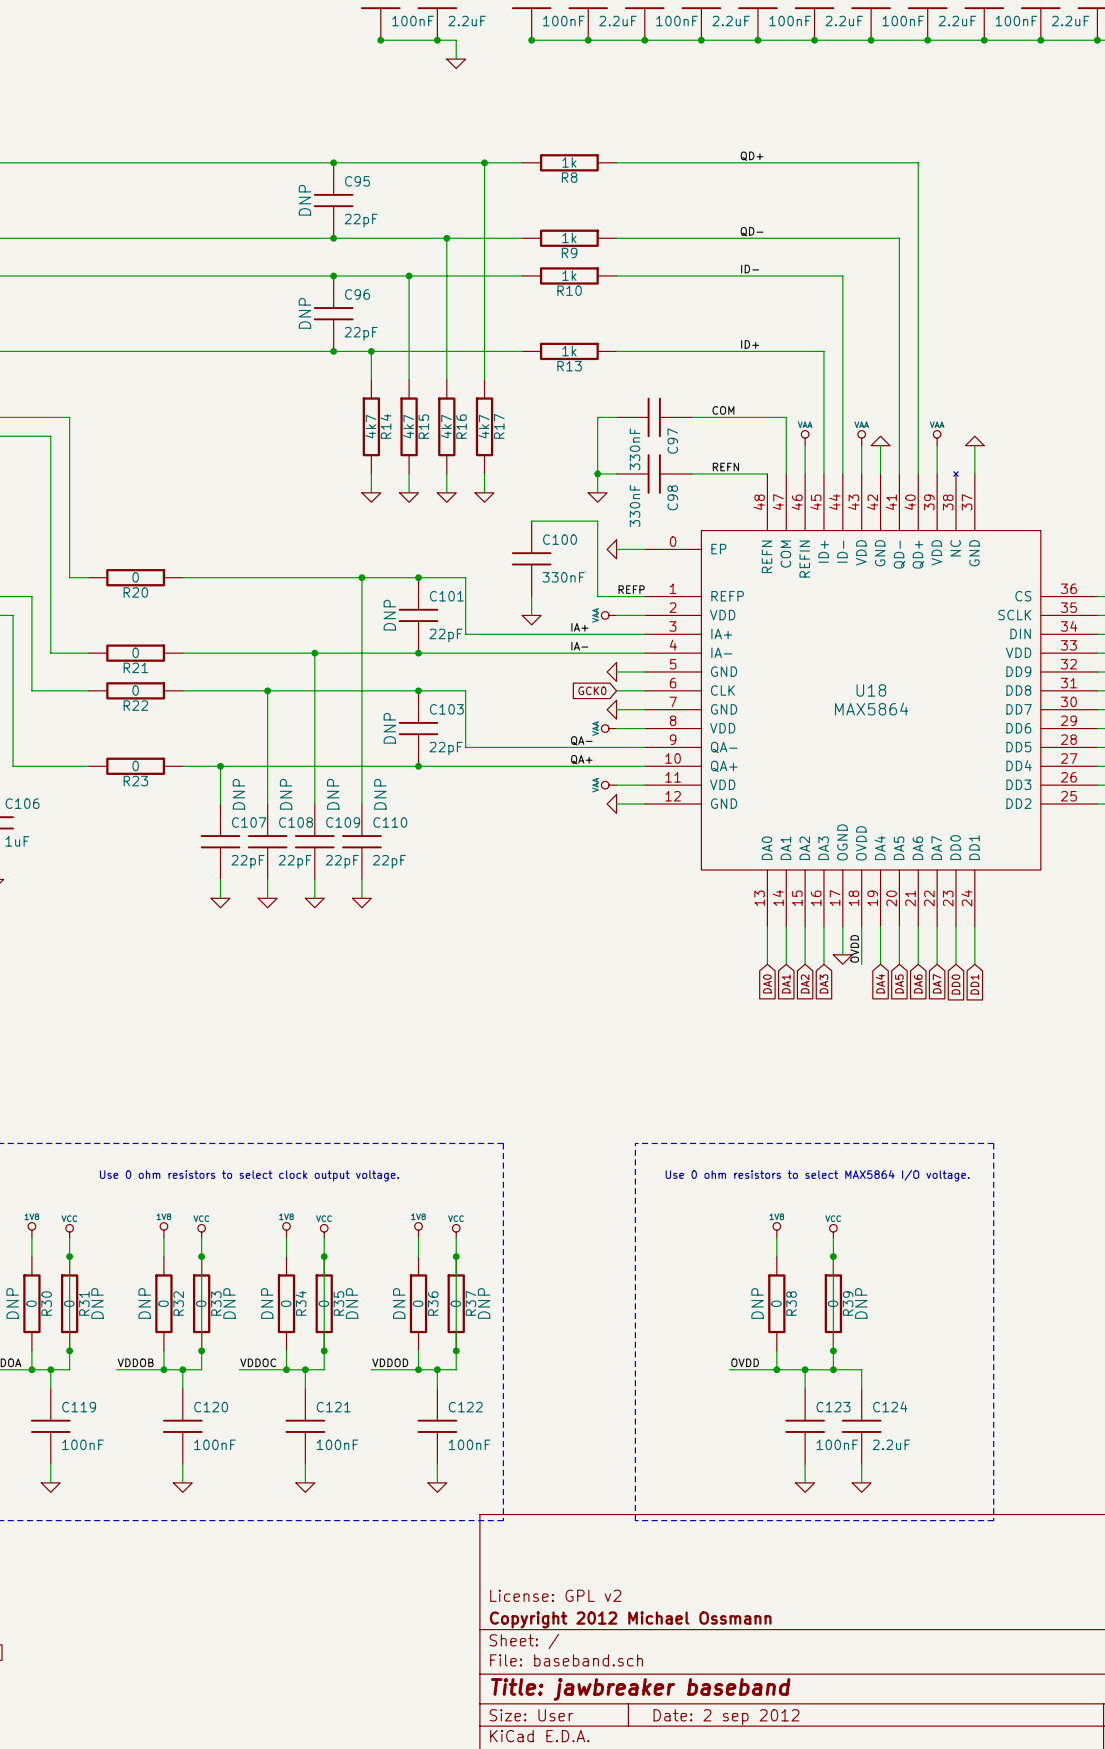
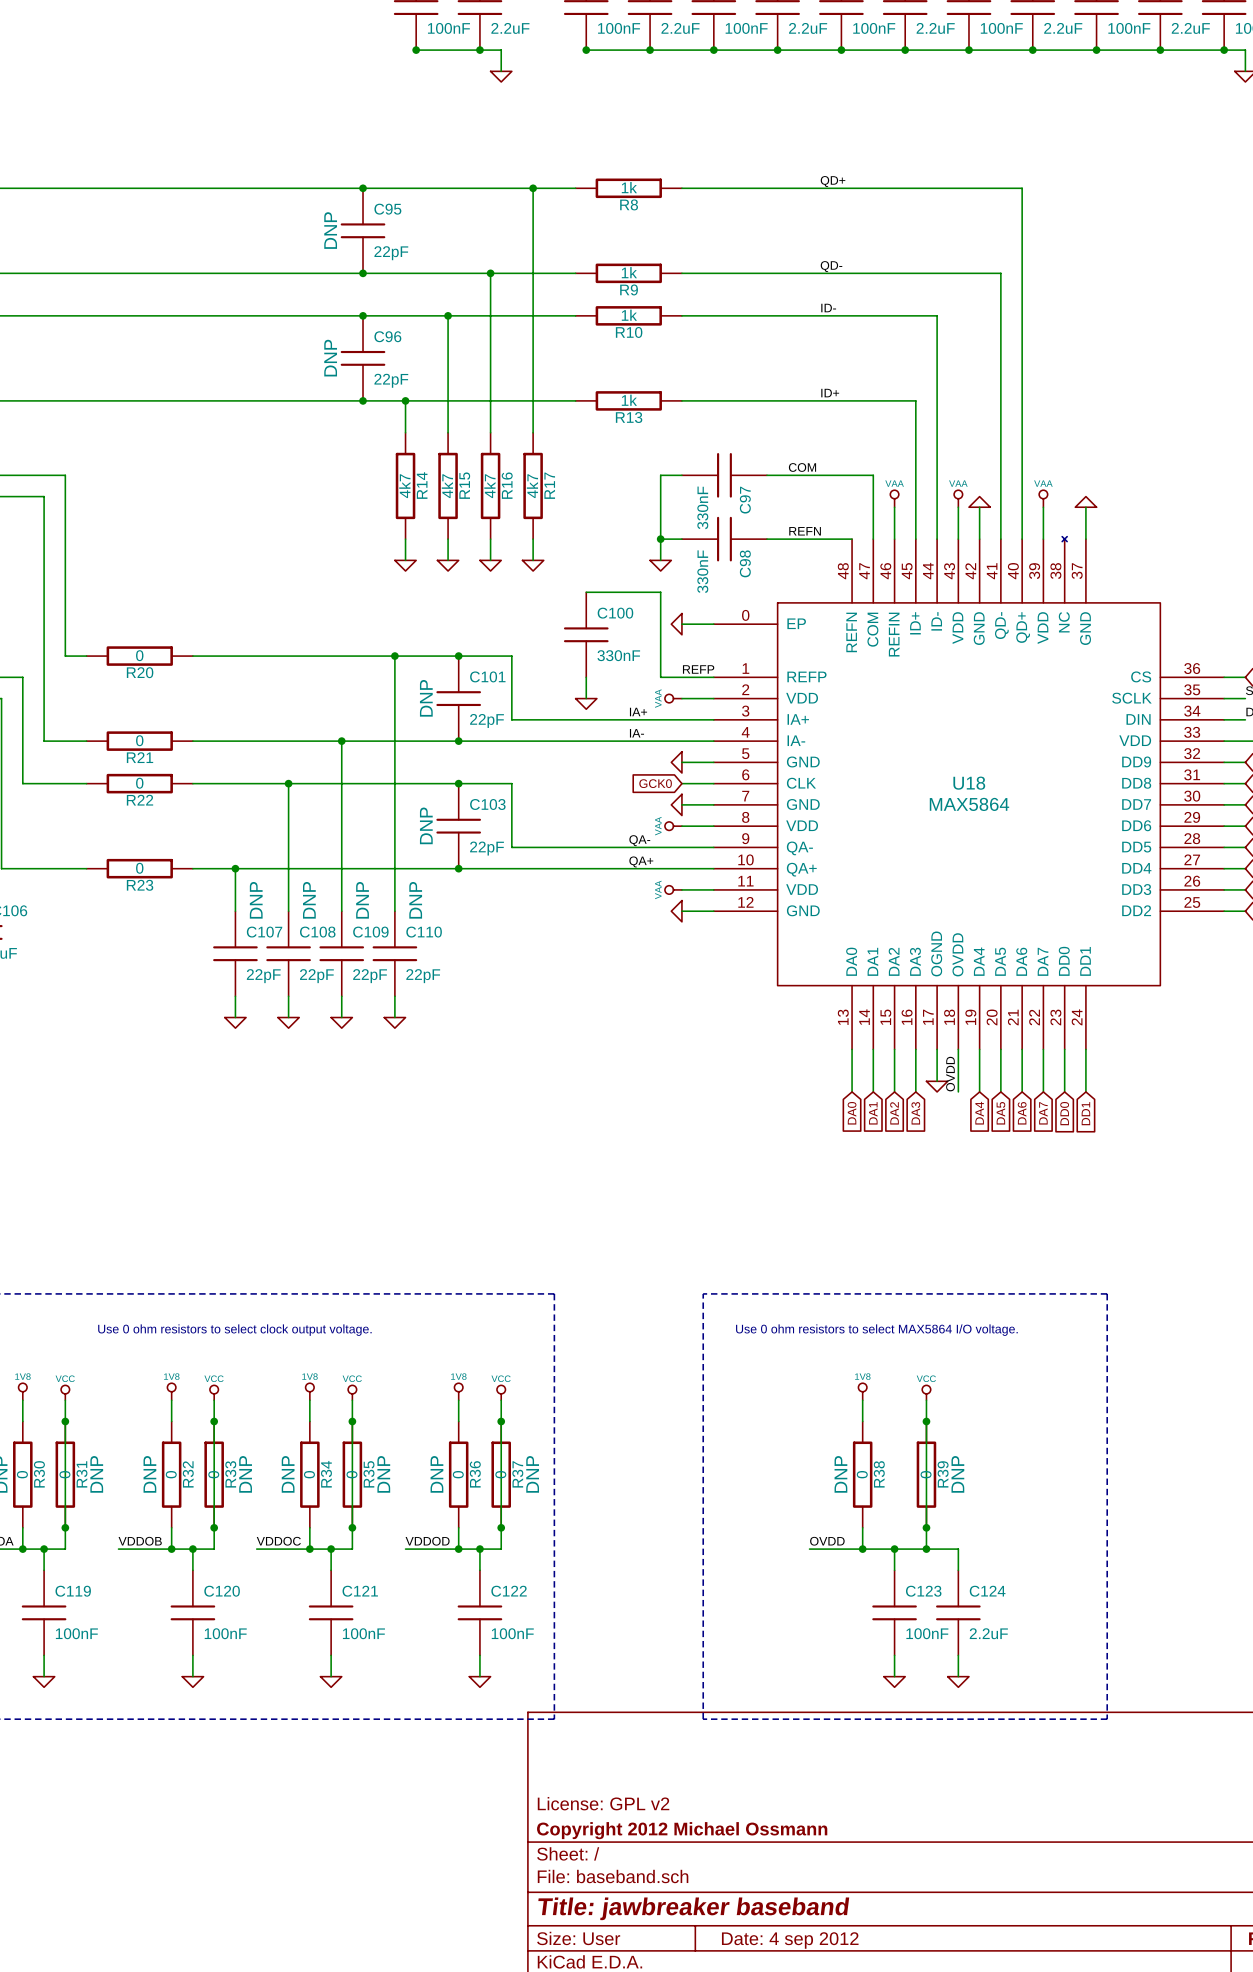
title block: Date: 2 sep 2012 (726, 1717) -> Date: 4 sep 2012 (790, 1940)

